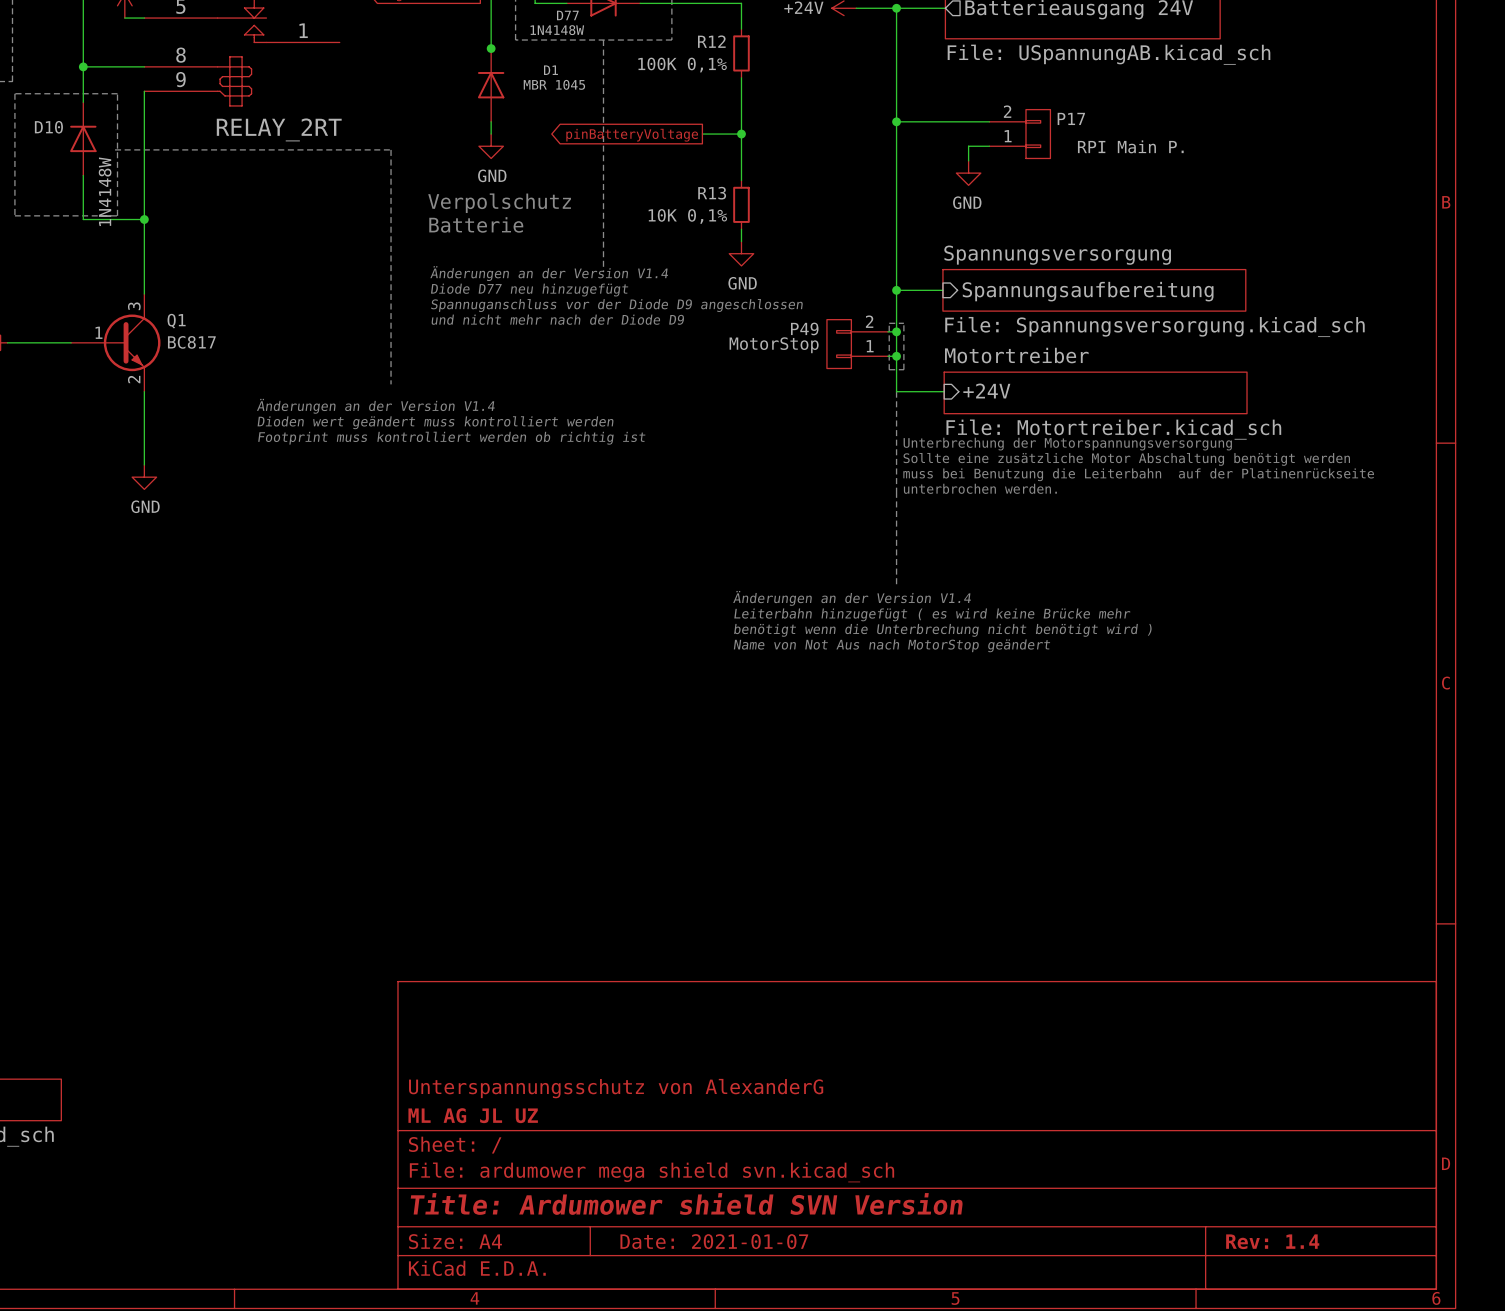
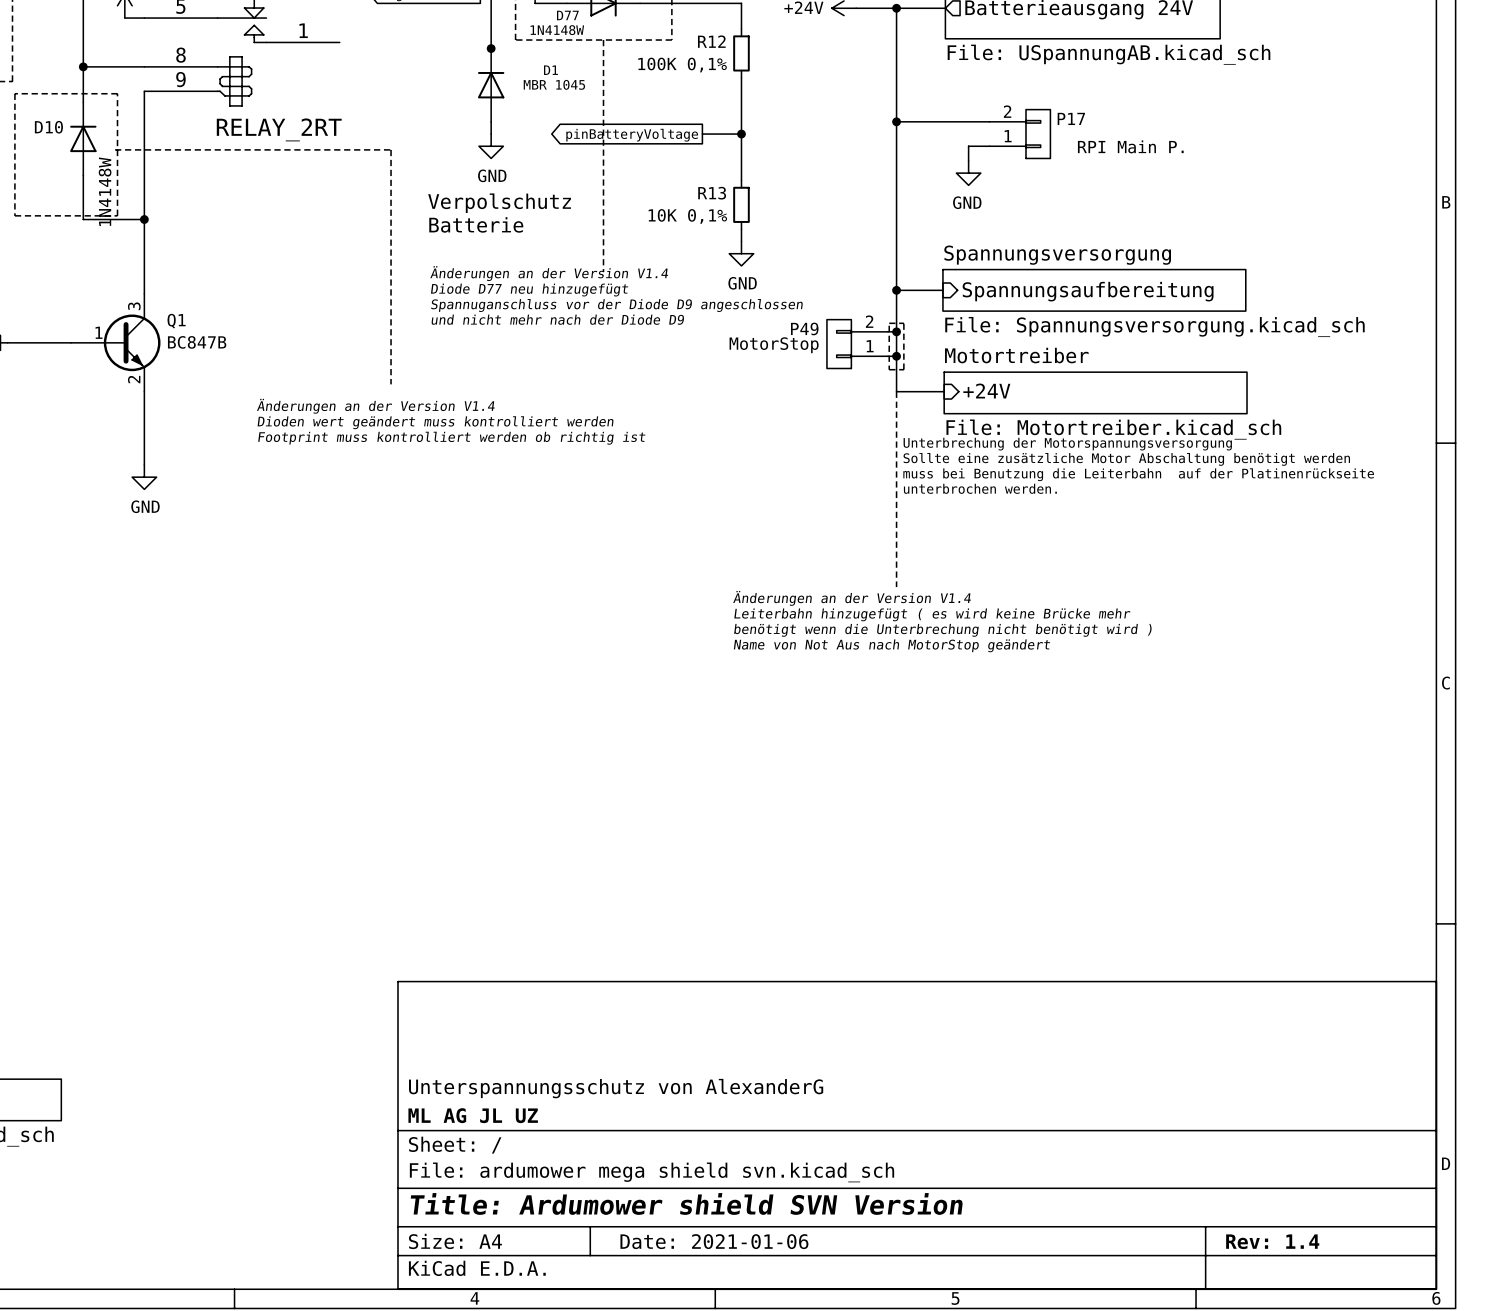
Q1 value: BC817 (191, 342) -> BC847B (197, 342)
title block: Date: 2021-01-07 (714, 1241) -> Date: 2021-01-06 (714, 1241)

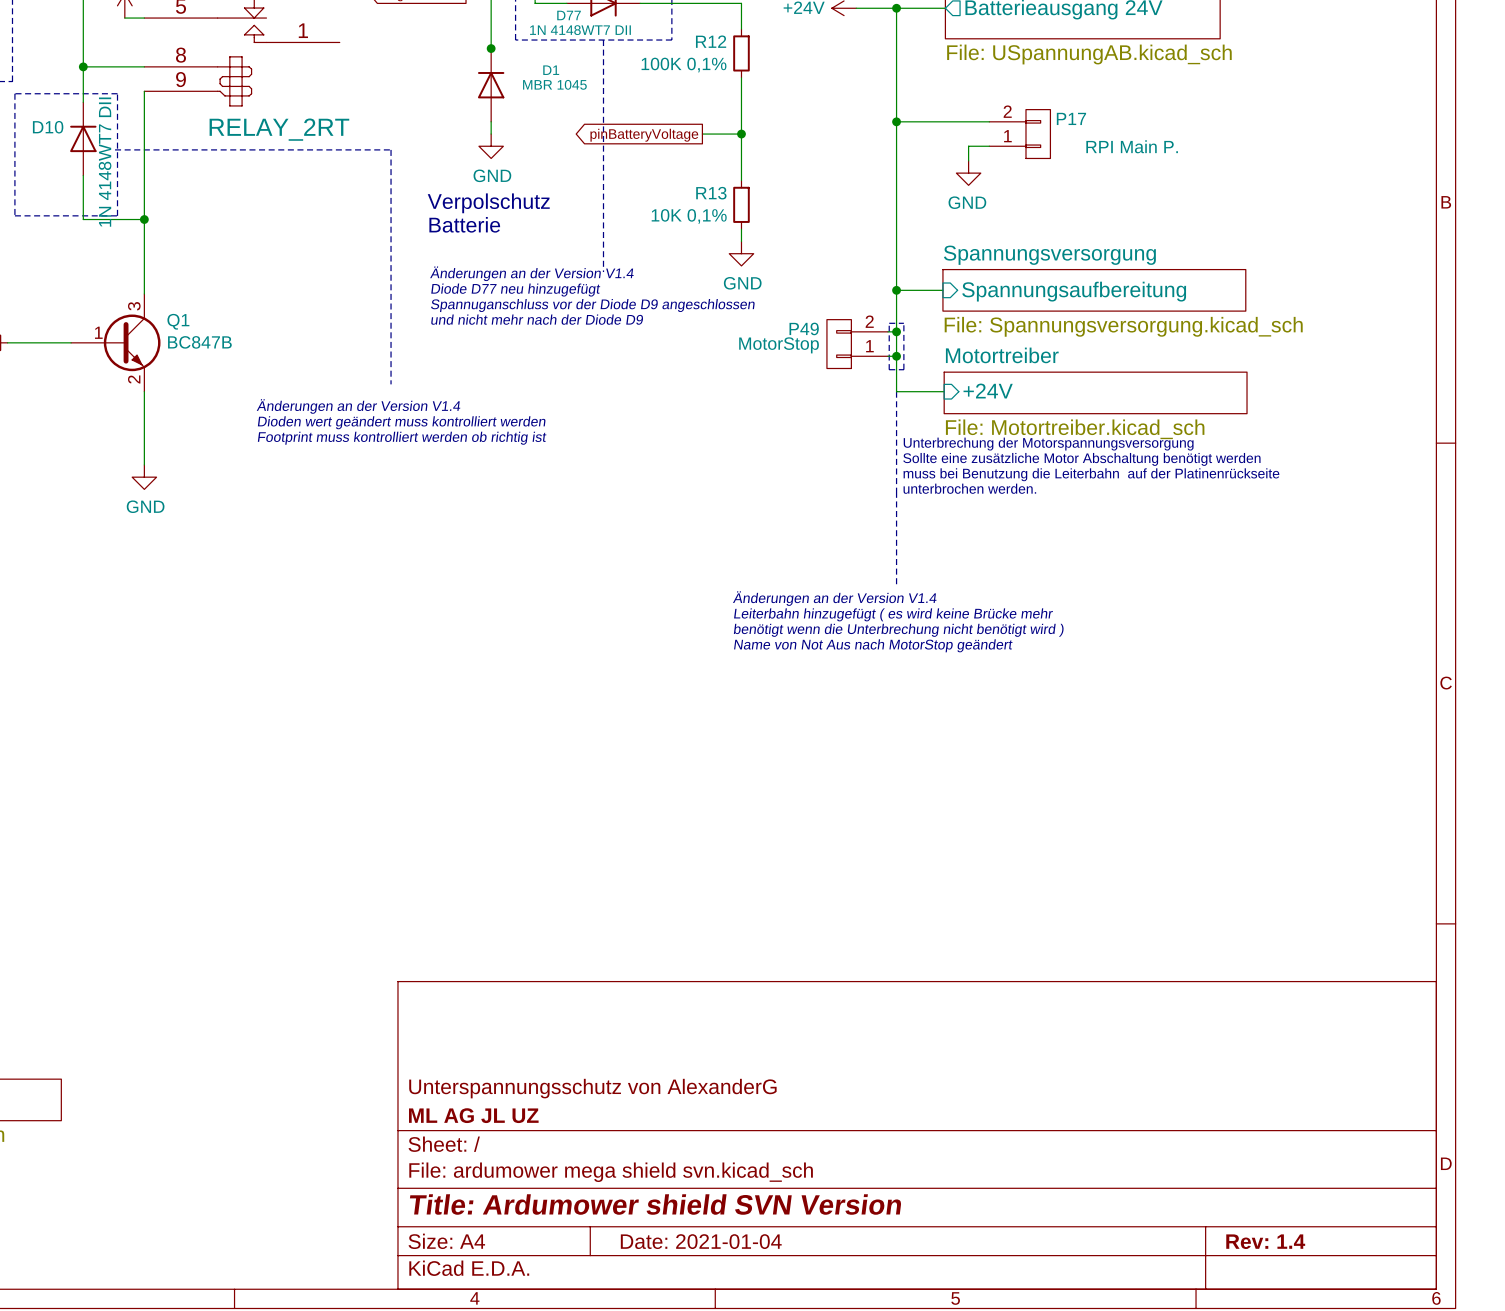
D77 value: 1N4148W (557, 30) -> 1N 4148WT7 DII (580, 30)
D10 value: 1N4148W (105, 191) -> 1N 4148WT7 DII (105, 162)
title block: Date: 2021-01-06 (714, 1241) -> Date: 2021-01-04 (701, 1241)

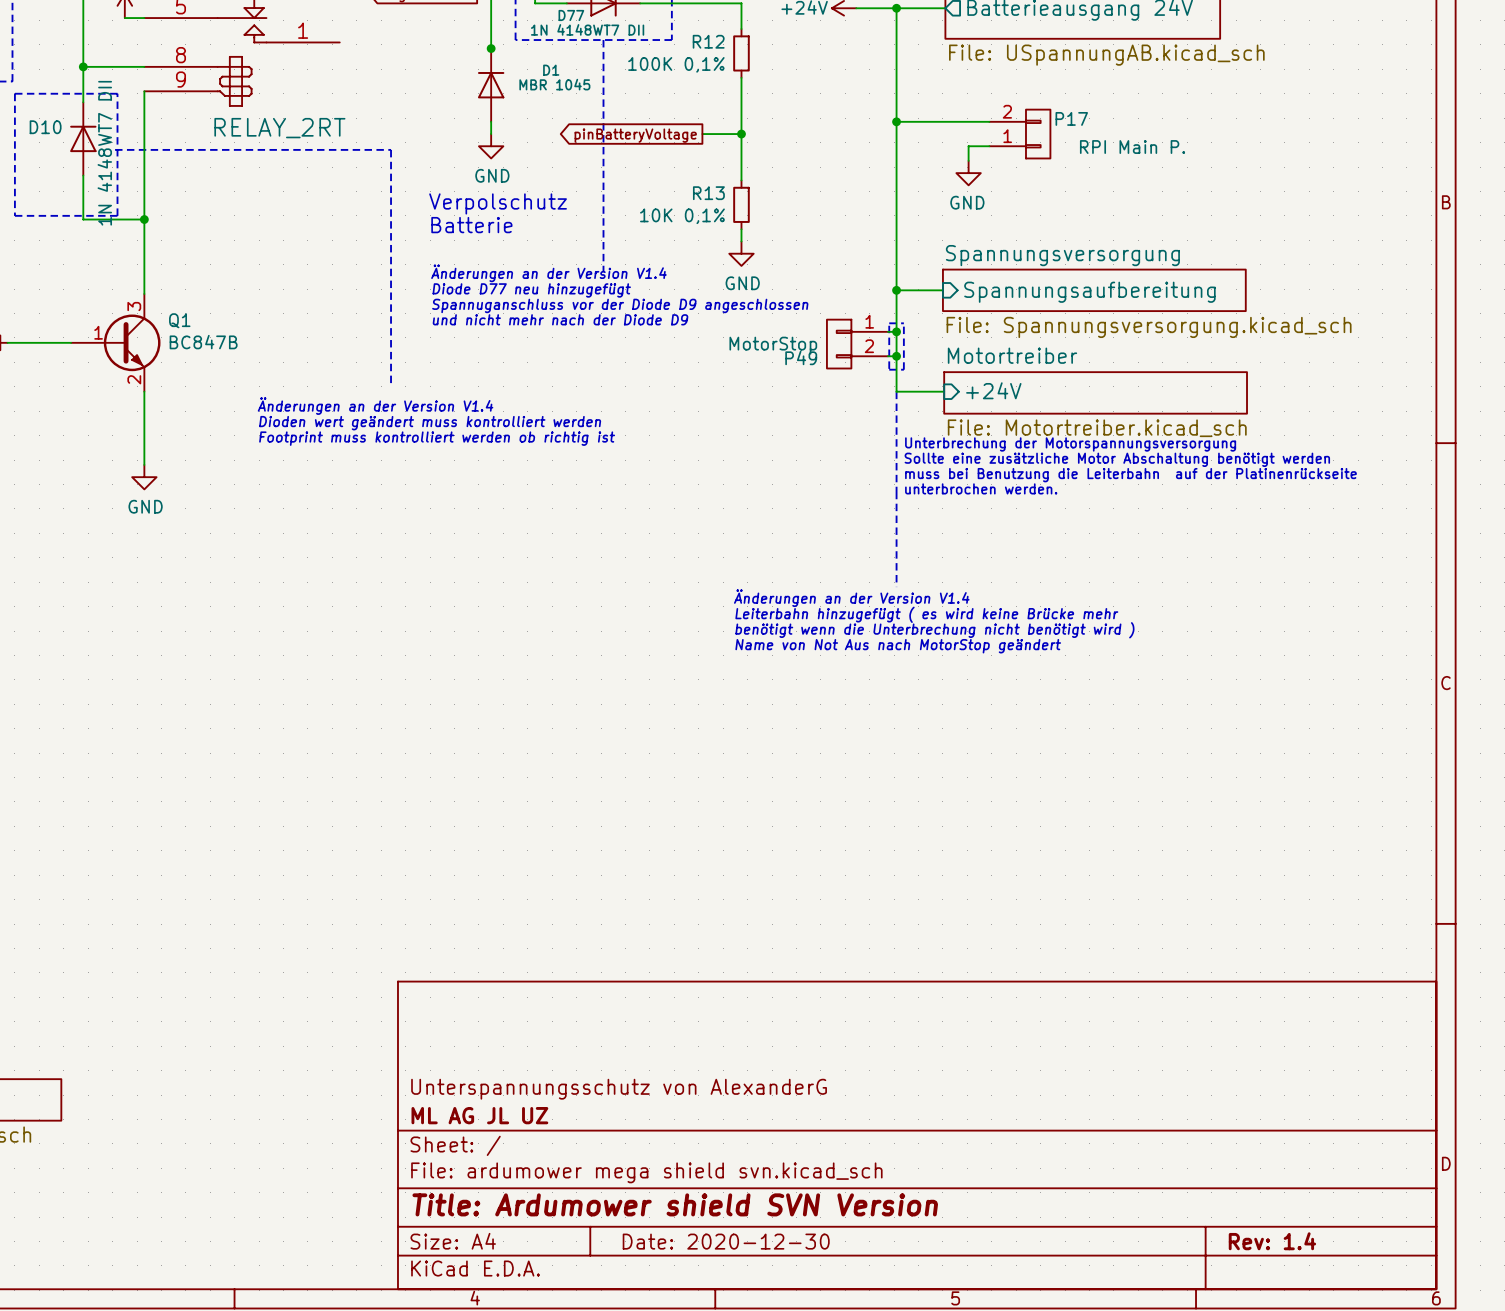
P49 flip: as is (839, 344) -> up-down (839, 344)
title block: Date: 2021-01-04 (701, 1241) -> Date: 2020-12-30 (726, 1241)

